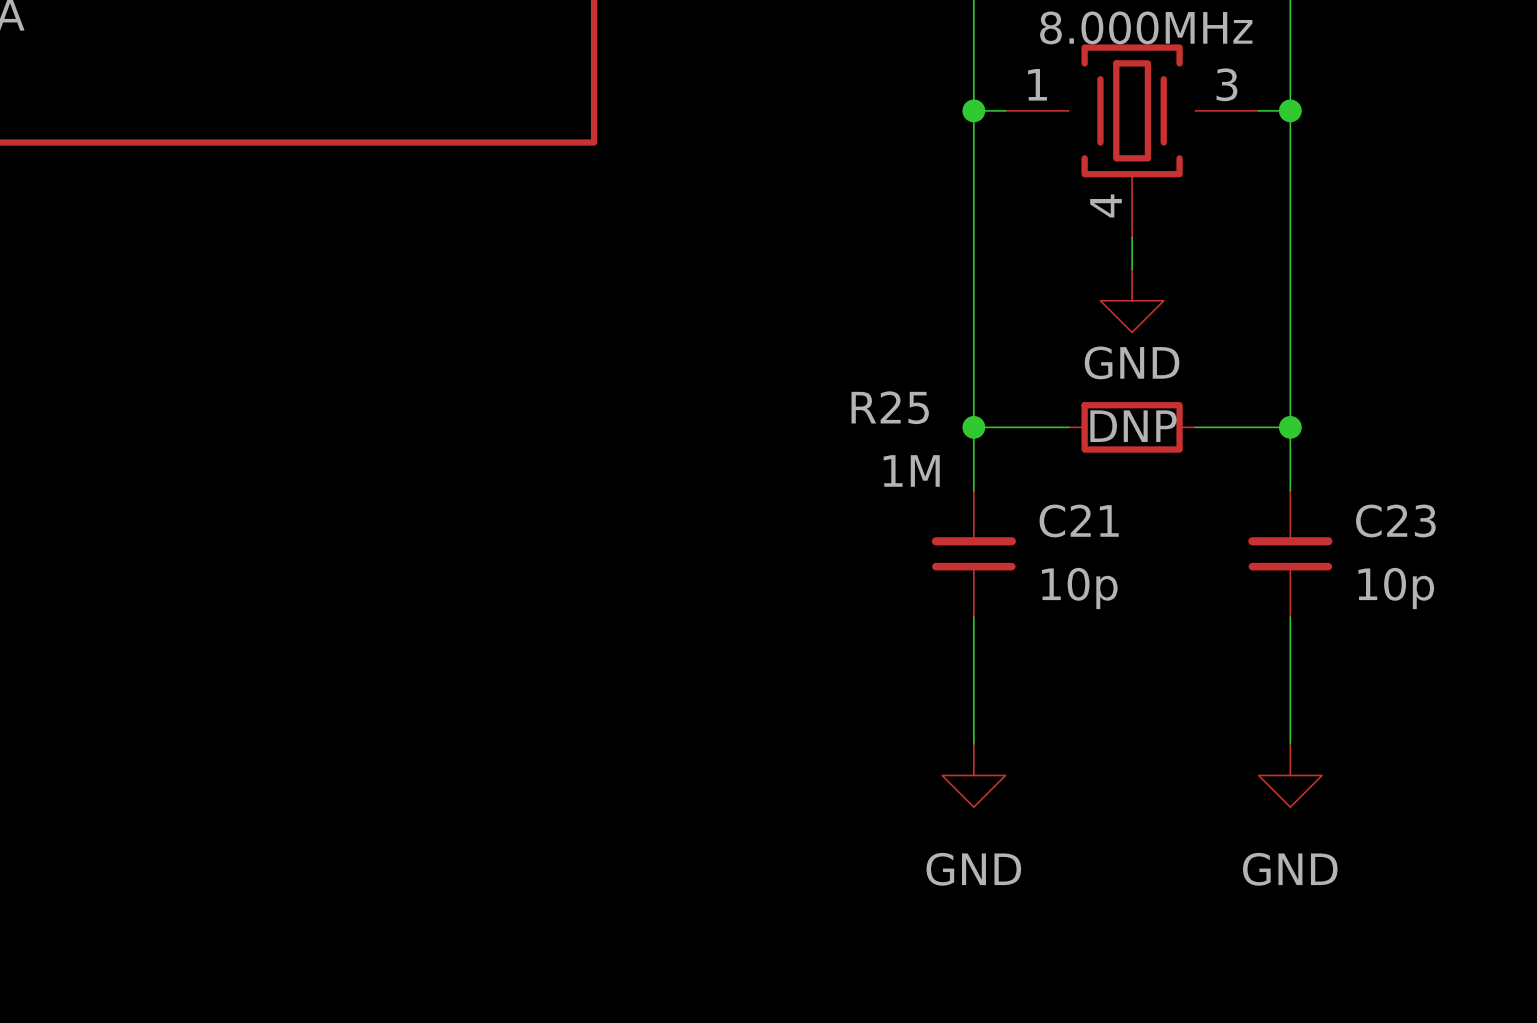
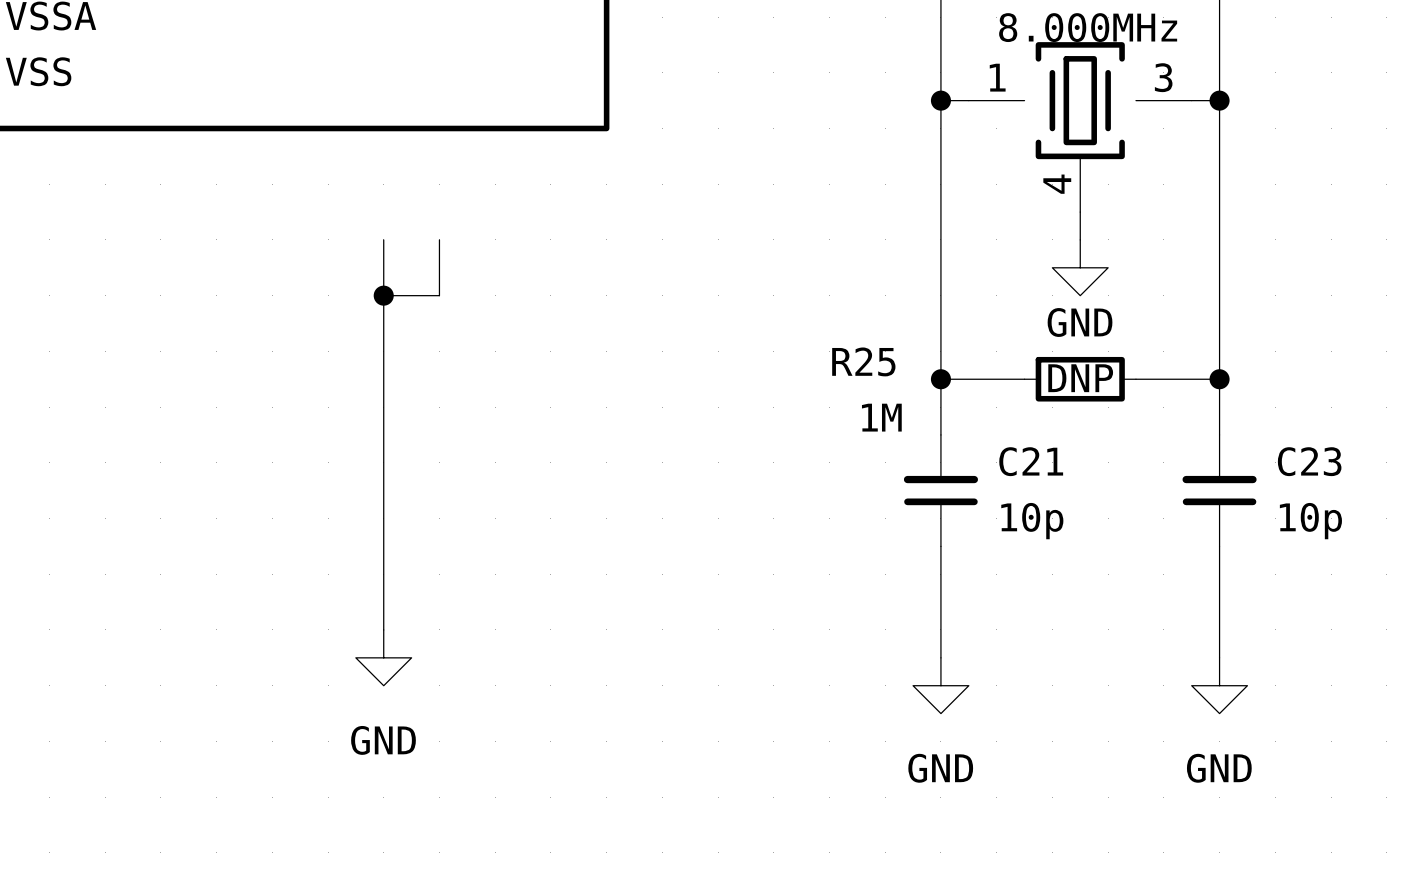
wire: none -> (383, 239) (383, 629)
wire: none -> (439, 239) (439, 295) (383, 295)
junction: none -> (383, 295)
power symbol: none -> GND (383, 657)

